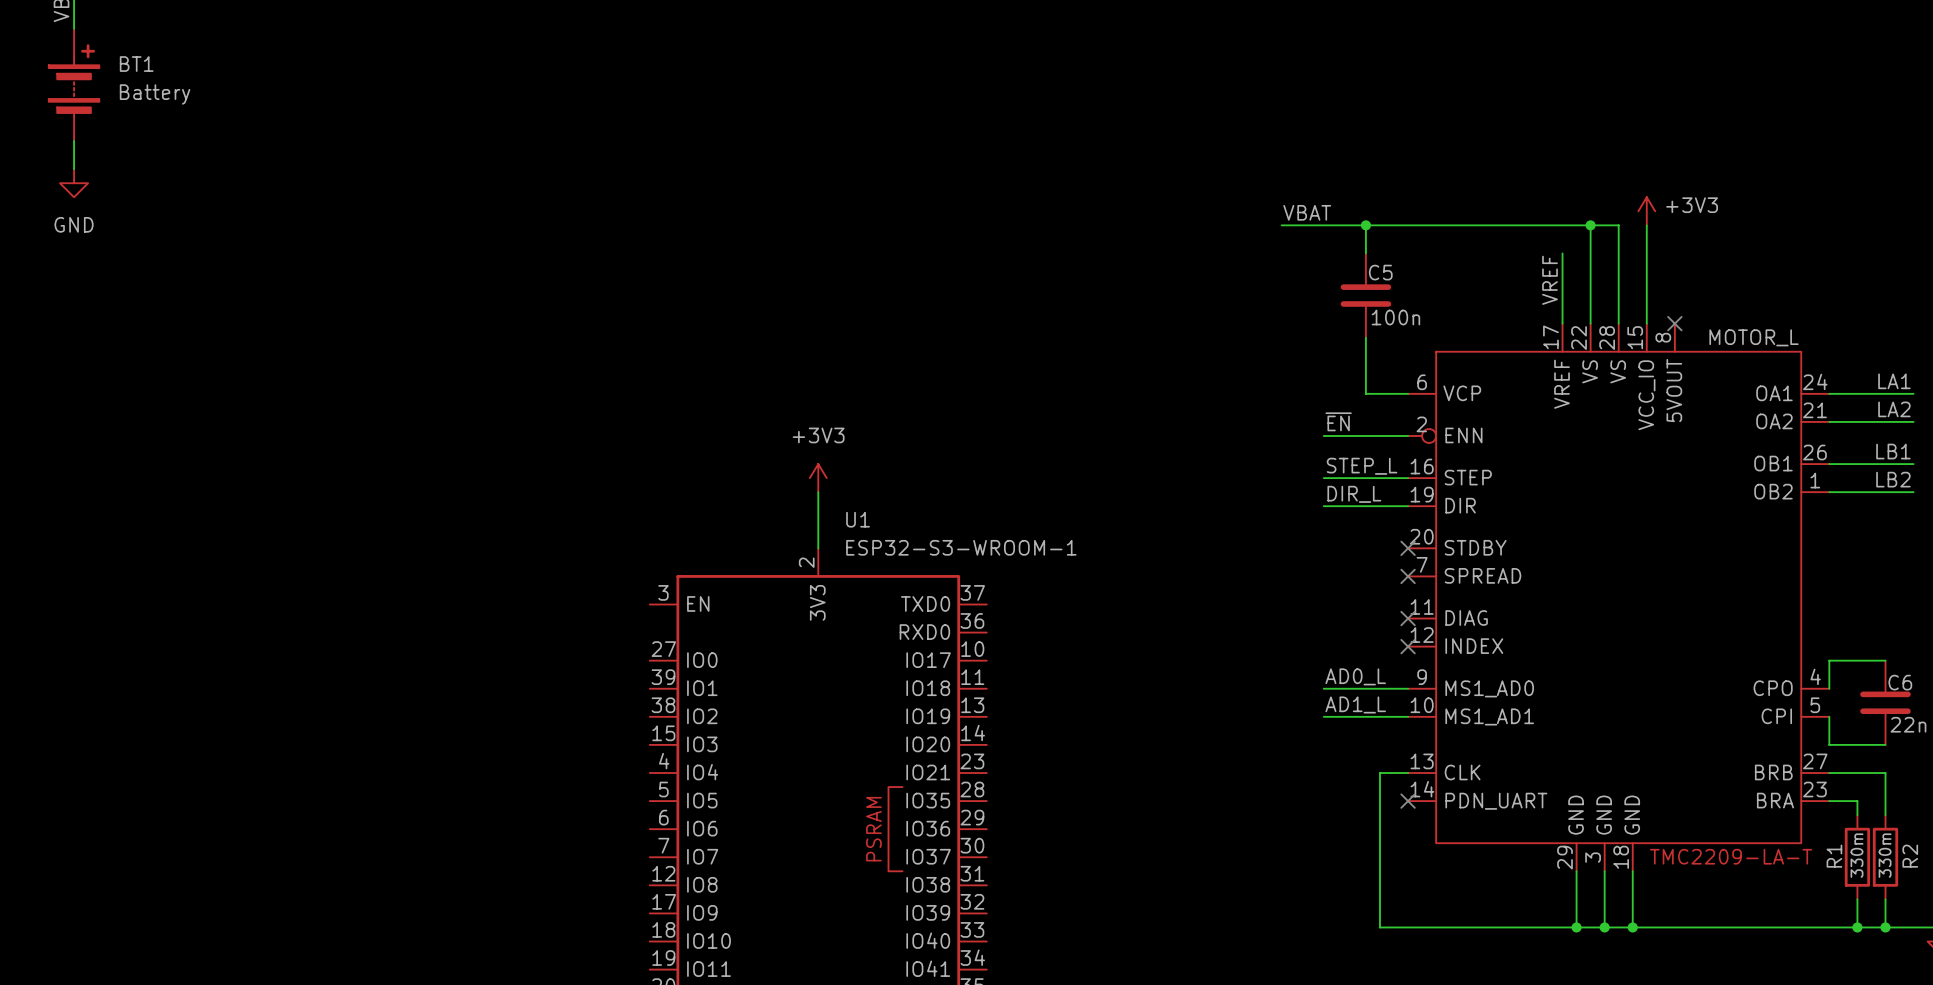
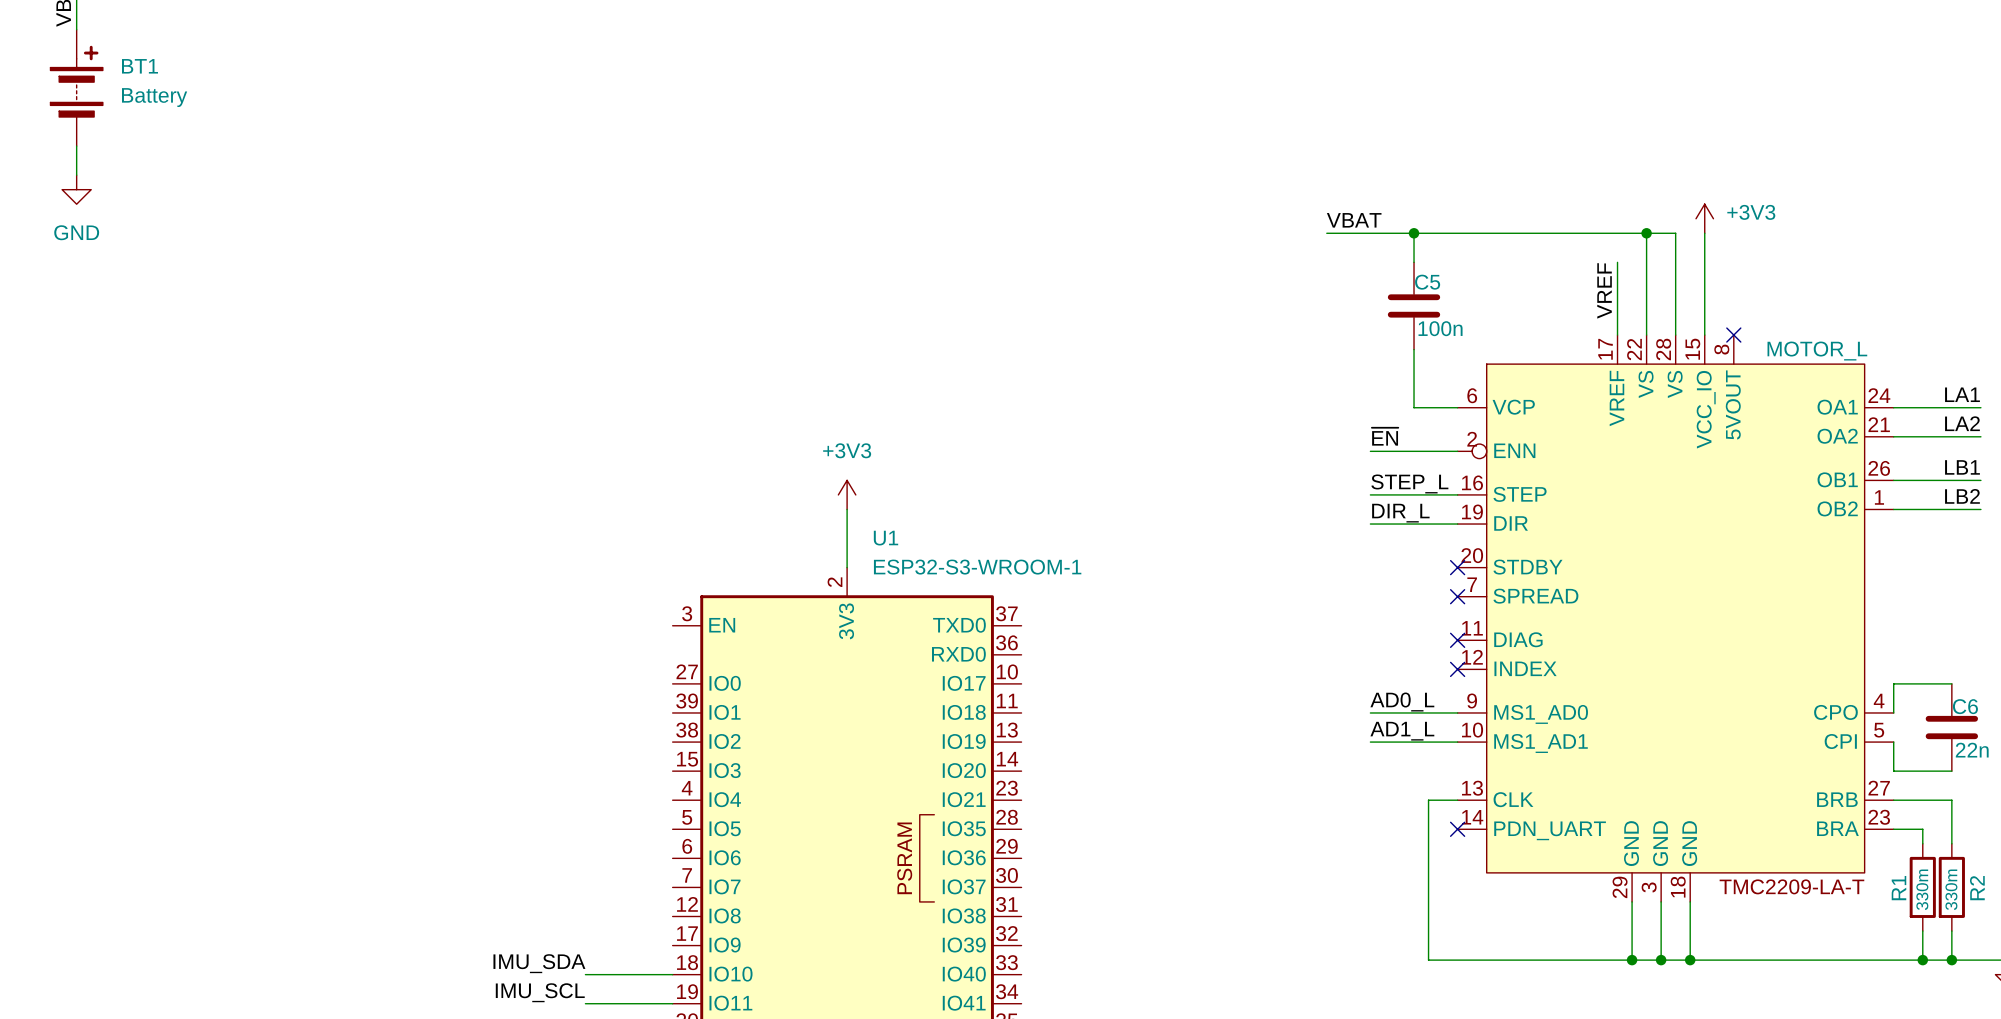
label: none -> IMU_SDA (539, 963)
wire: none -> (585, 974) (672, 974)
label: none -> IMU_SCL (540, 992)
wire: none -> (585, 1003) (672, 1003)

